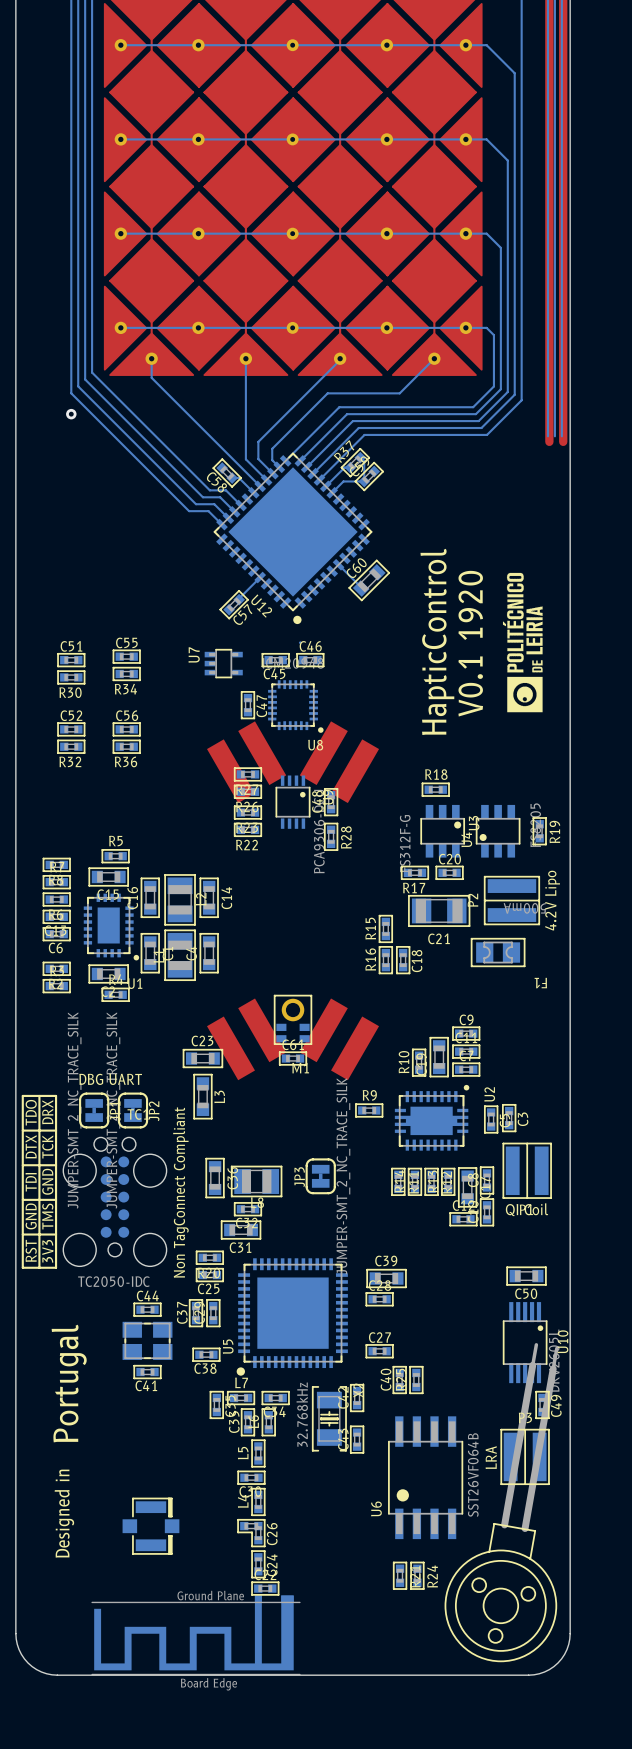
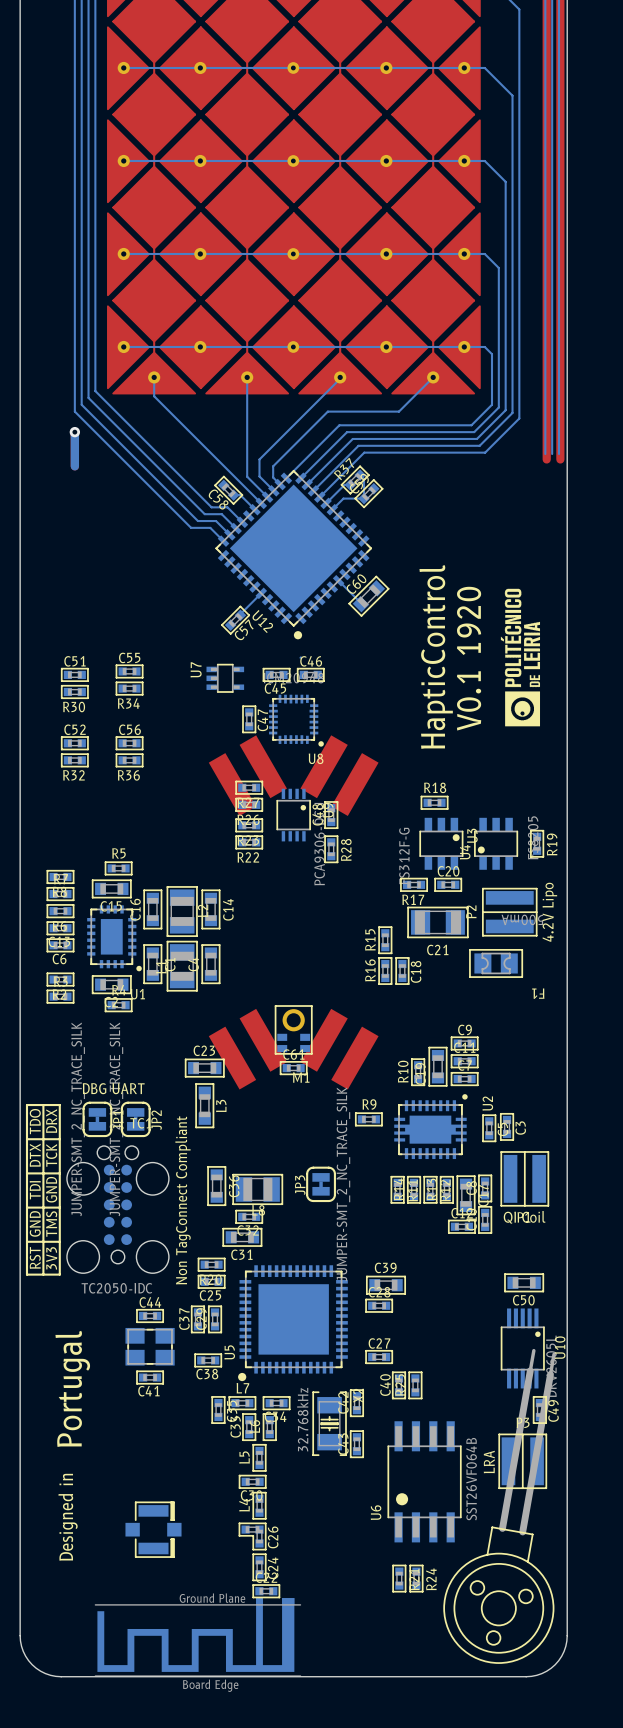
bottom track: none -> (74, 432) (74, 466)

